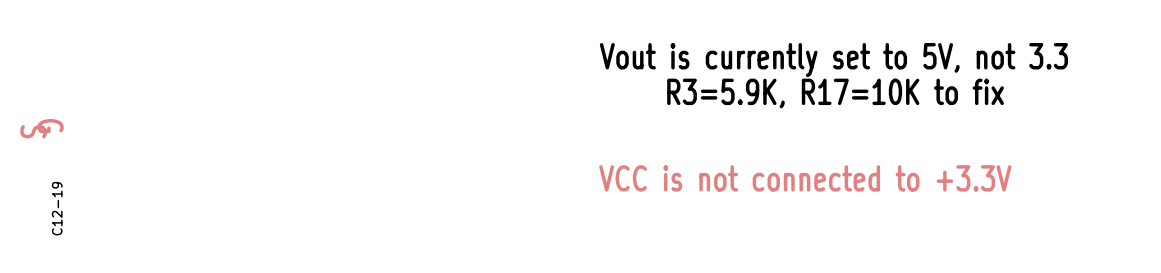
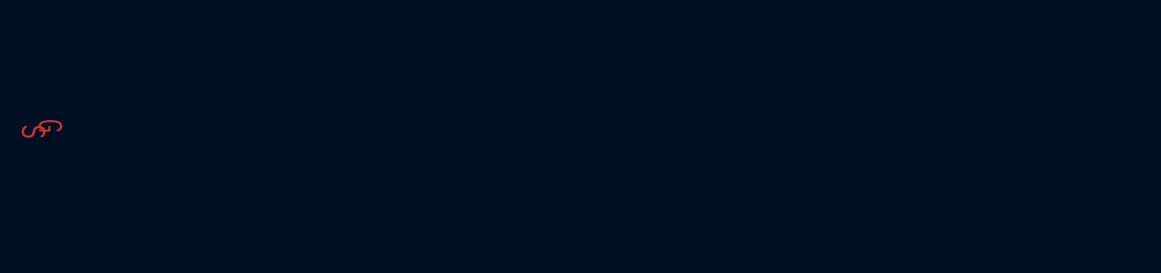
text: Vout is currently set to 5V, not 3.3 (833, 60) -> none
text: R3=5.9K, R17=10K to fix (835, 93) -> none
text: VCC is not connected to +3.3V (805, 178) -> none
text: C12-19 (57, 208) -> none

